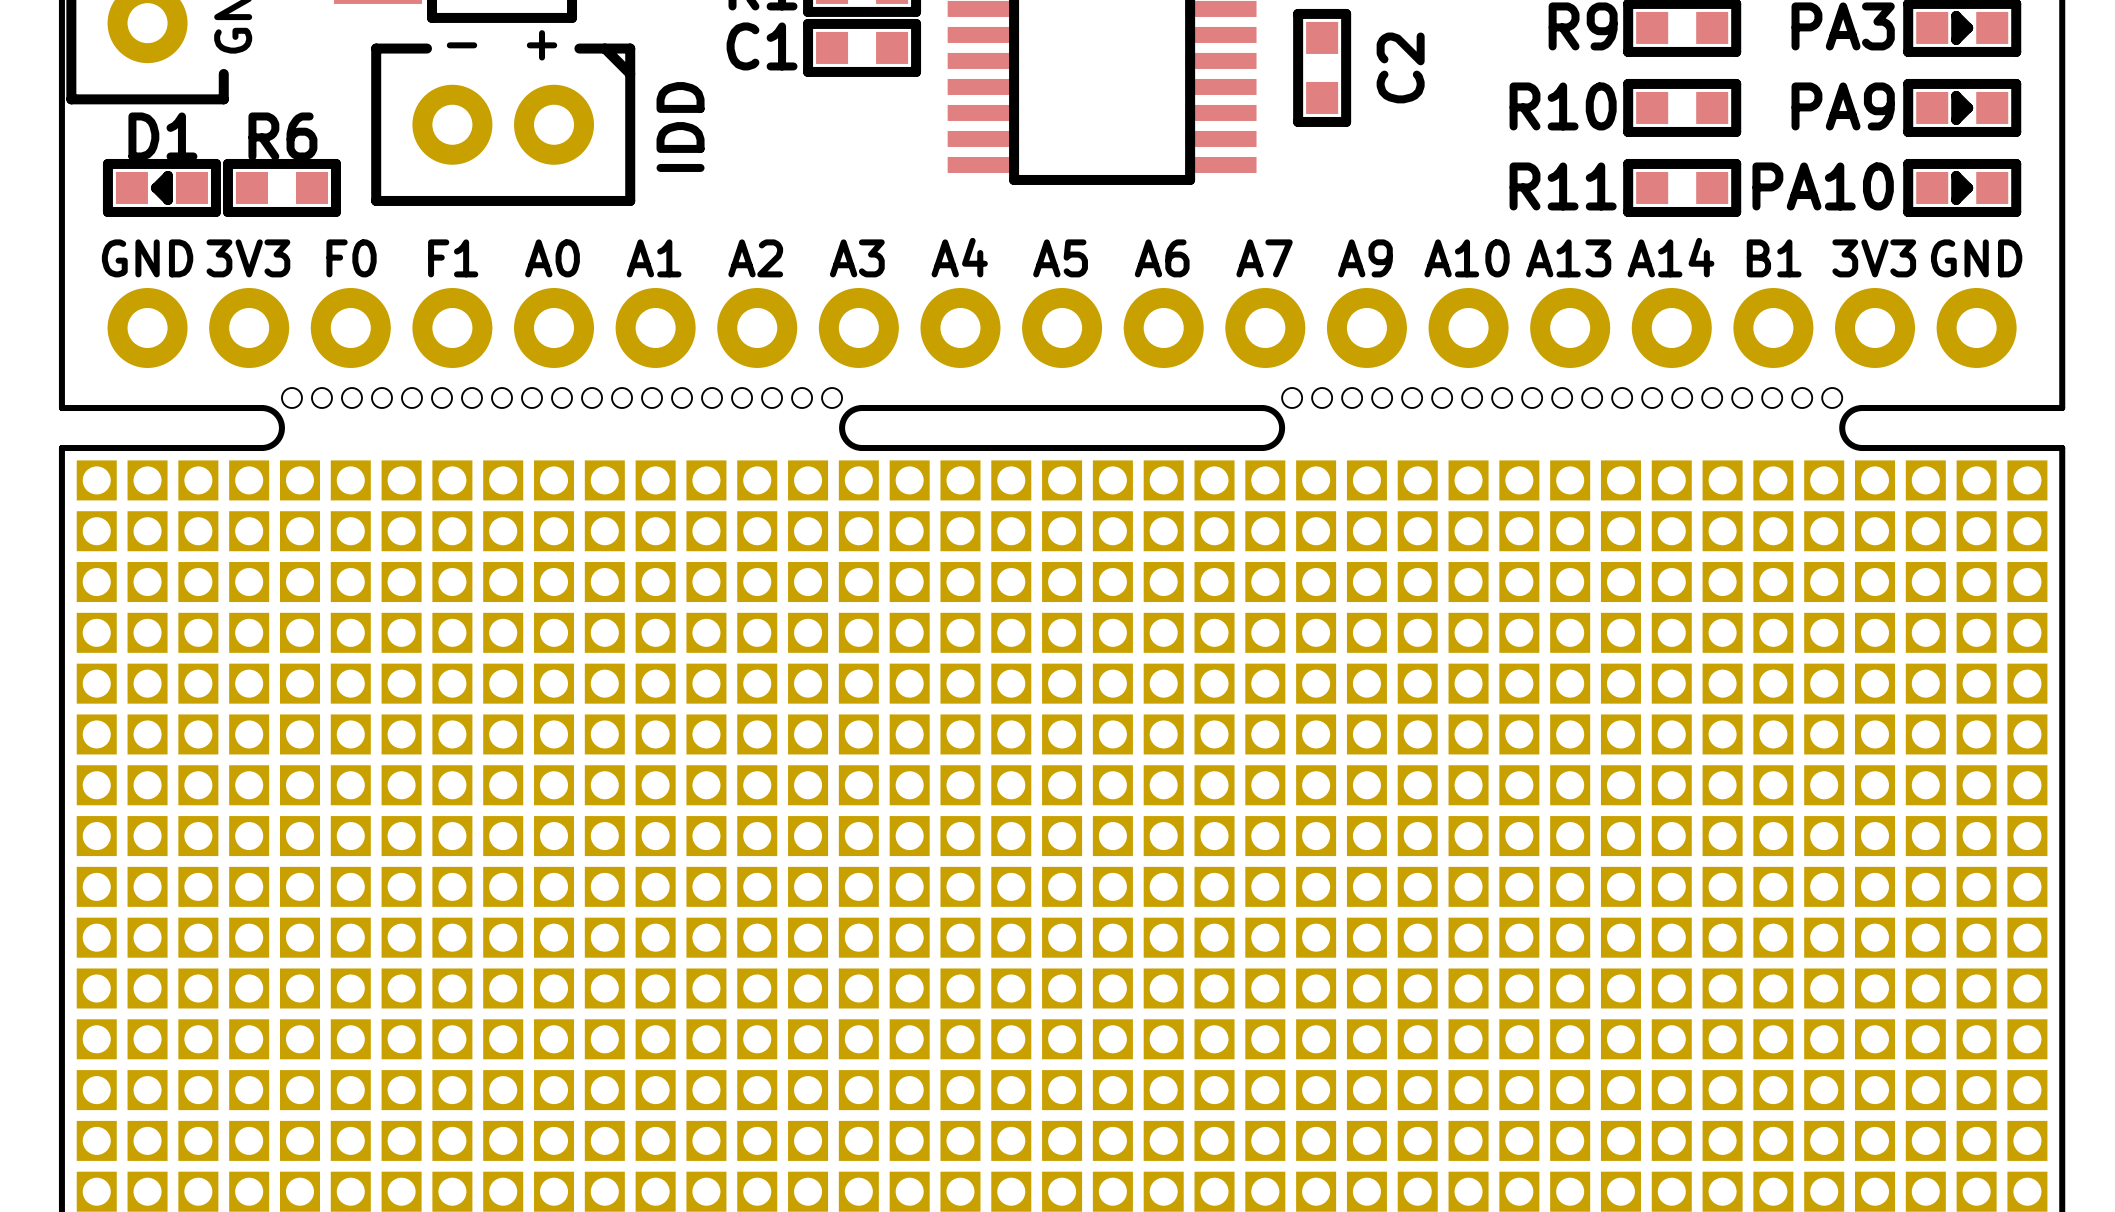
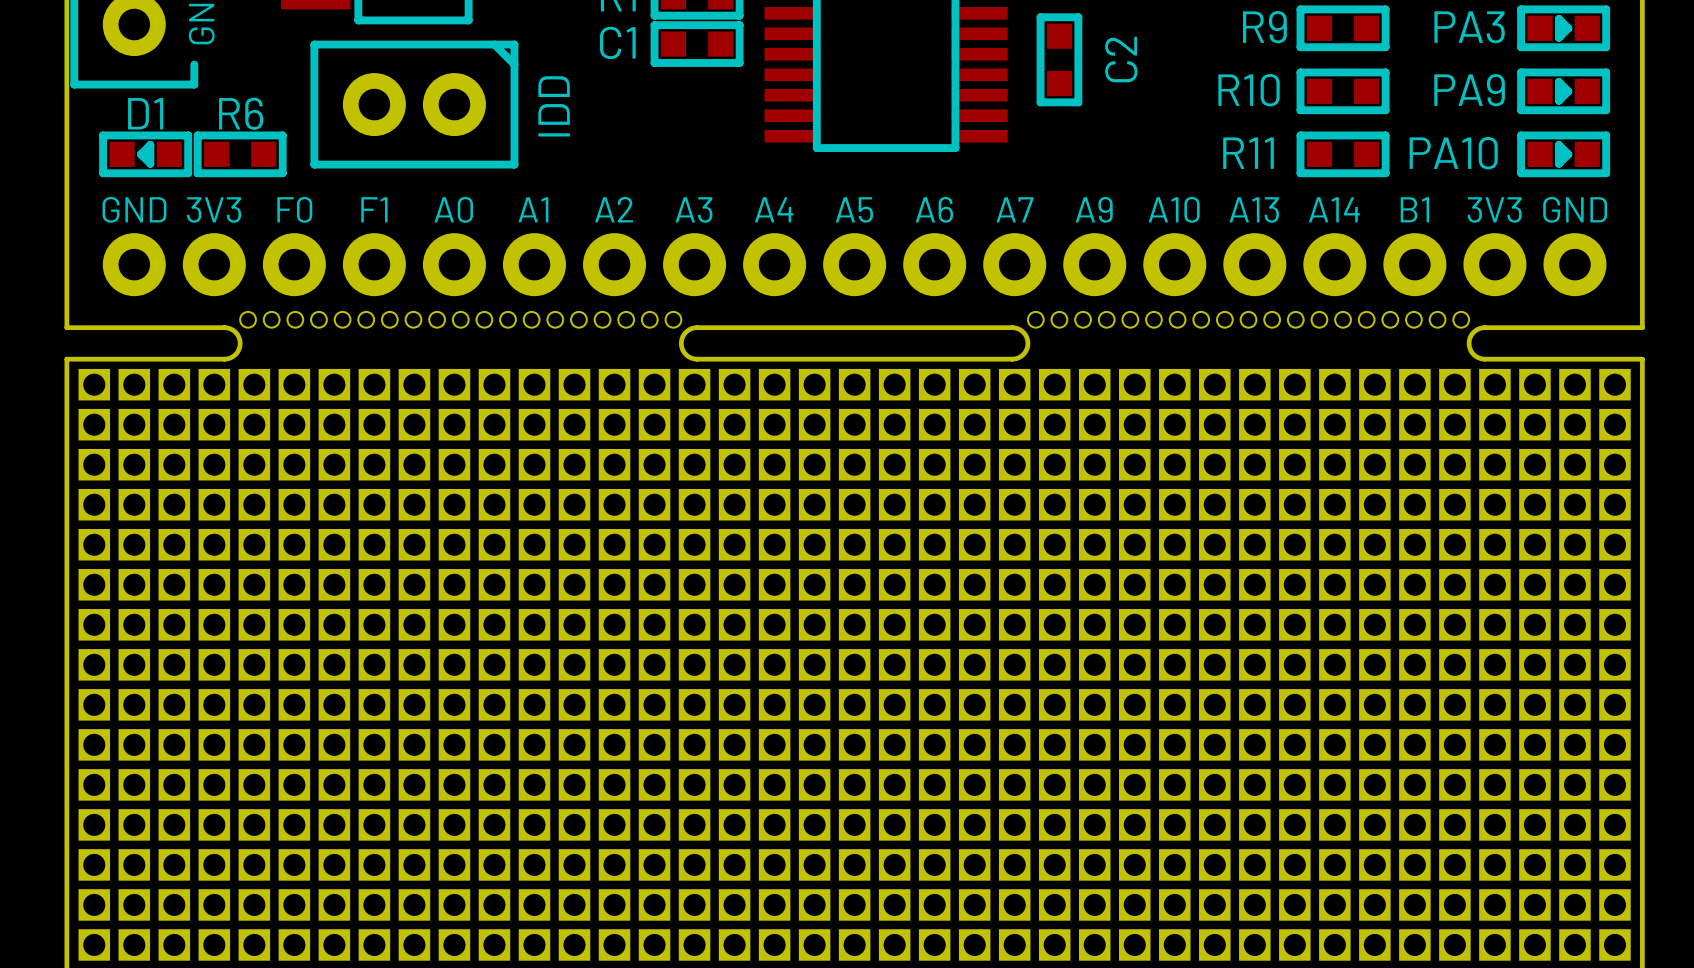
part footprint: [371, 43, 636, 206] -> [310, 40, 519, 169]
text: - (462, 45) -> none
text: + (542, 45) -> none

